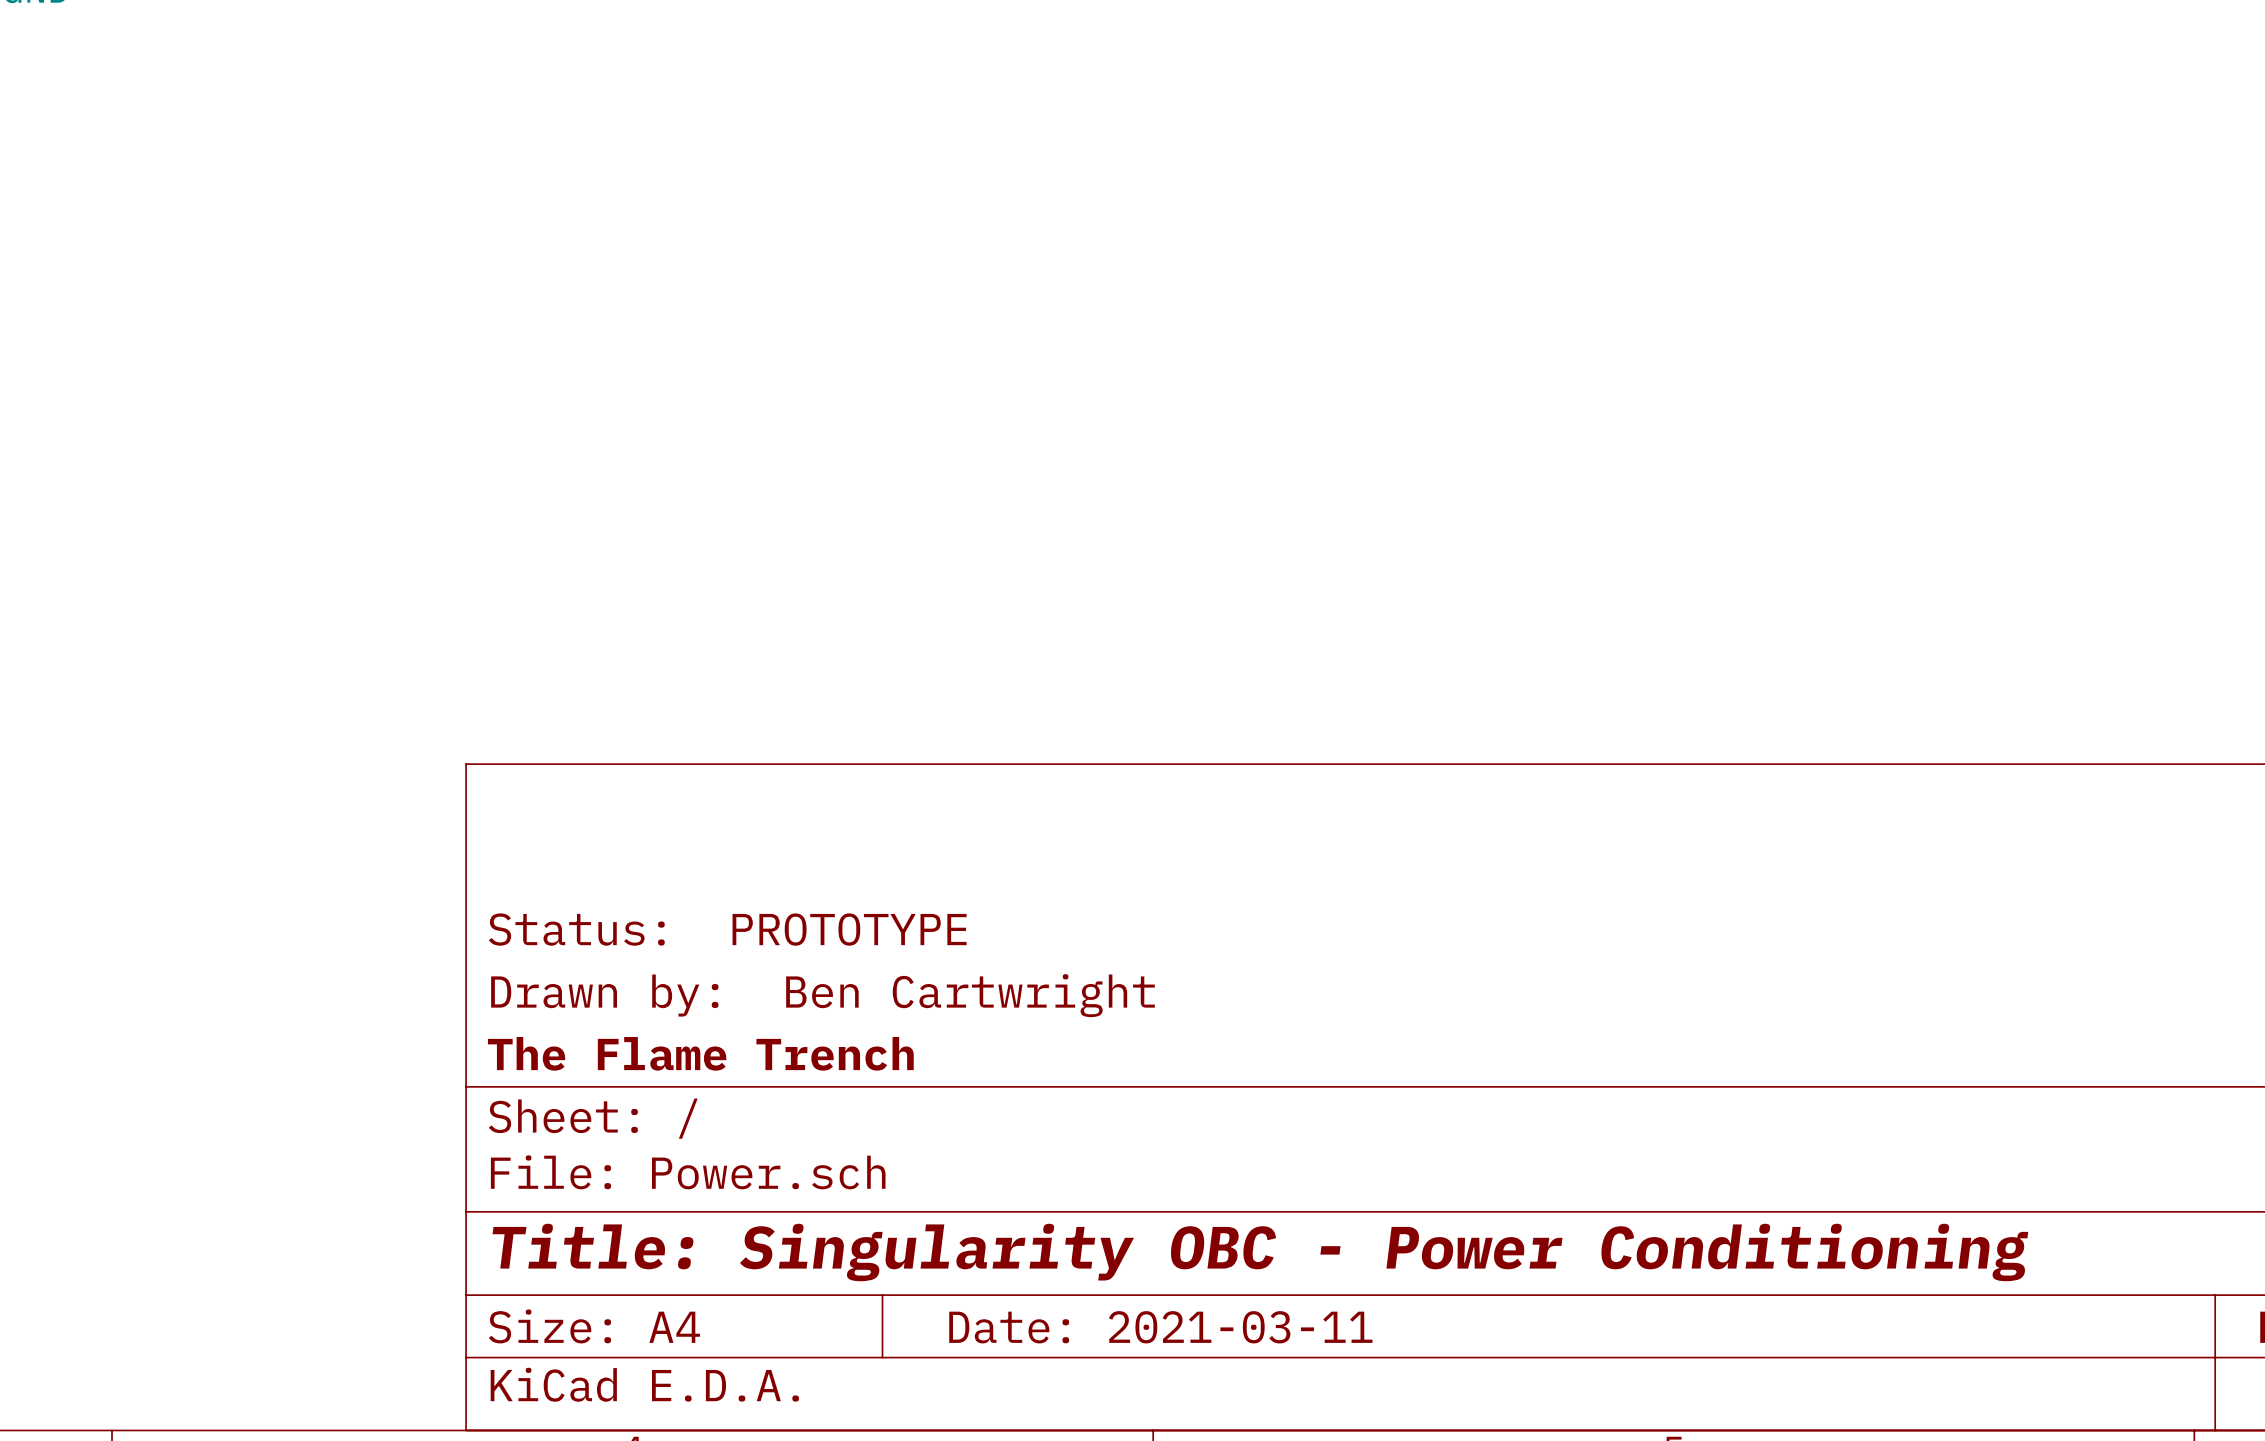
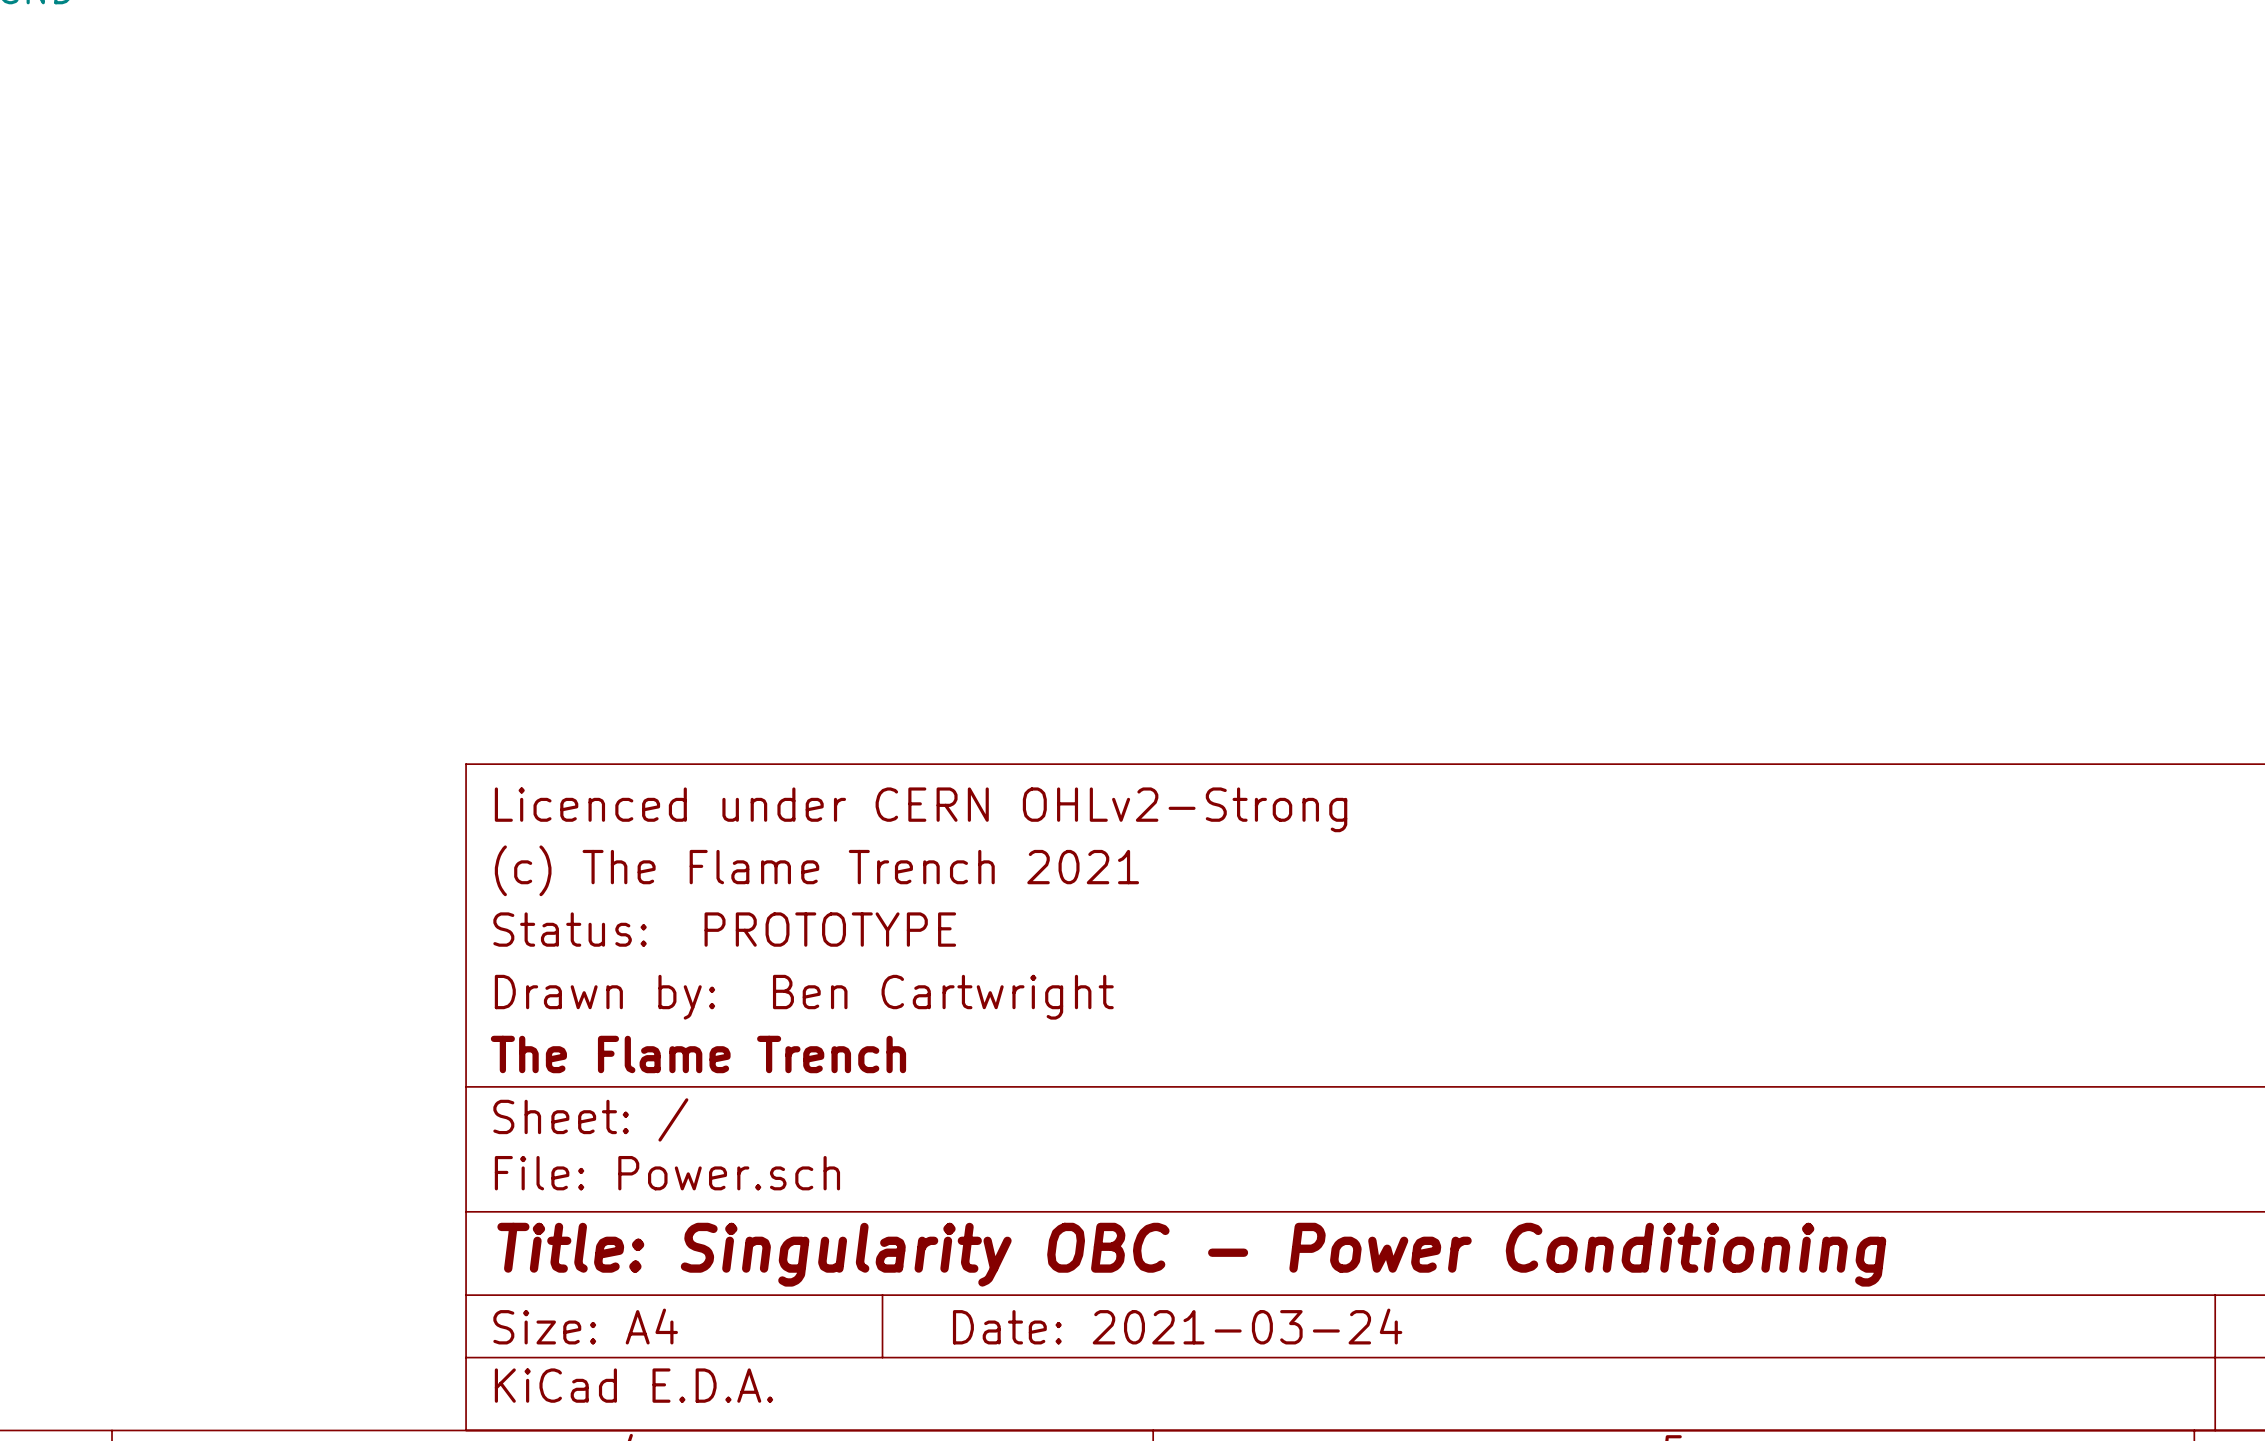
title block: none -> Licenced under CERN OHLv2-Strong (921, 809)
title block: none -> (c) The Flame Trench 2021 (816, 870)
title block: Date: 2021-03-11 (1160, 1327) -> Date: 2021-03-24 (1177, 1326)

